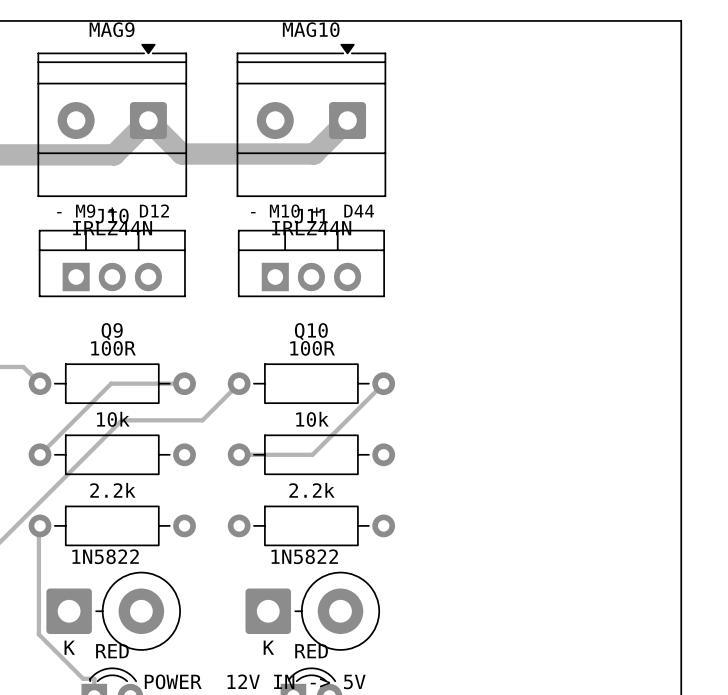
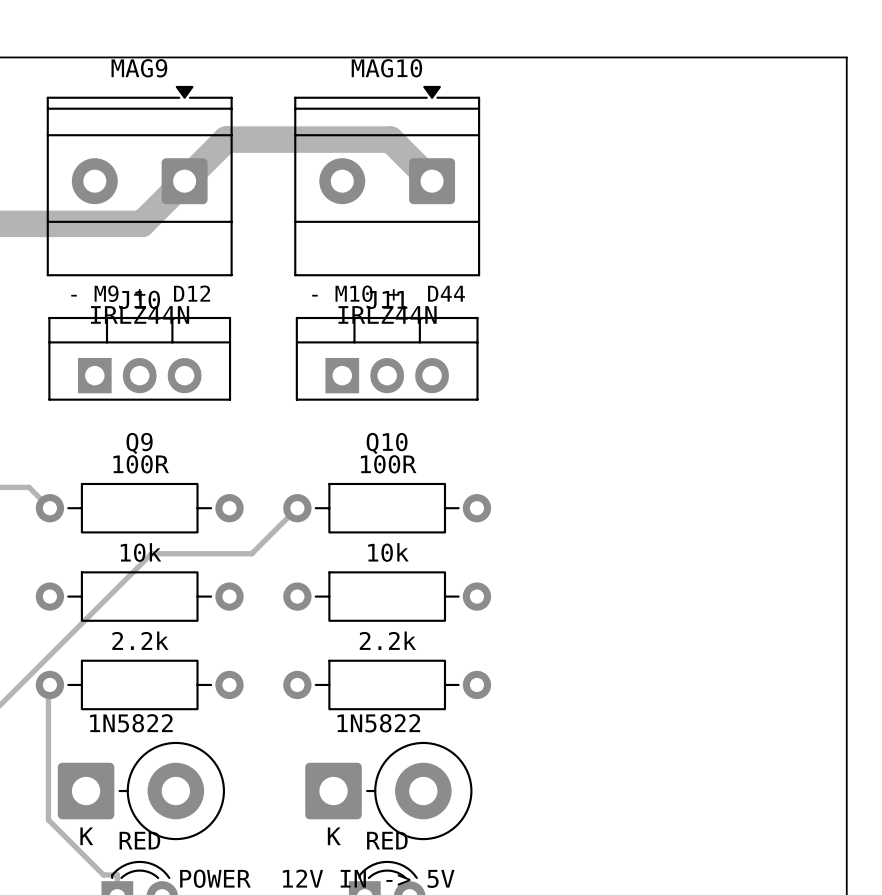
track: (148, 120) (181, 153) (314, 153) (347, 120) -> (184, 181) (226, 139) (390, 139) (432, 181)
track: (184, 383) (111, 383) (40, 454) -> none
track: (383, 383) (312, 454) (239, 454) -> none

